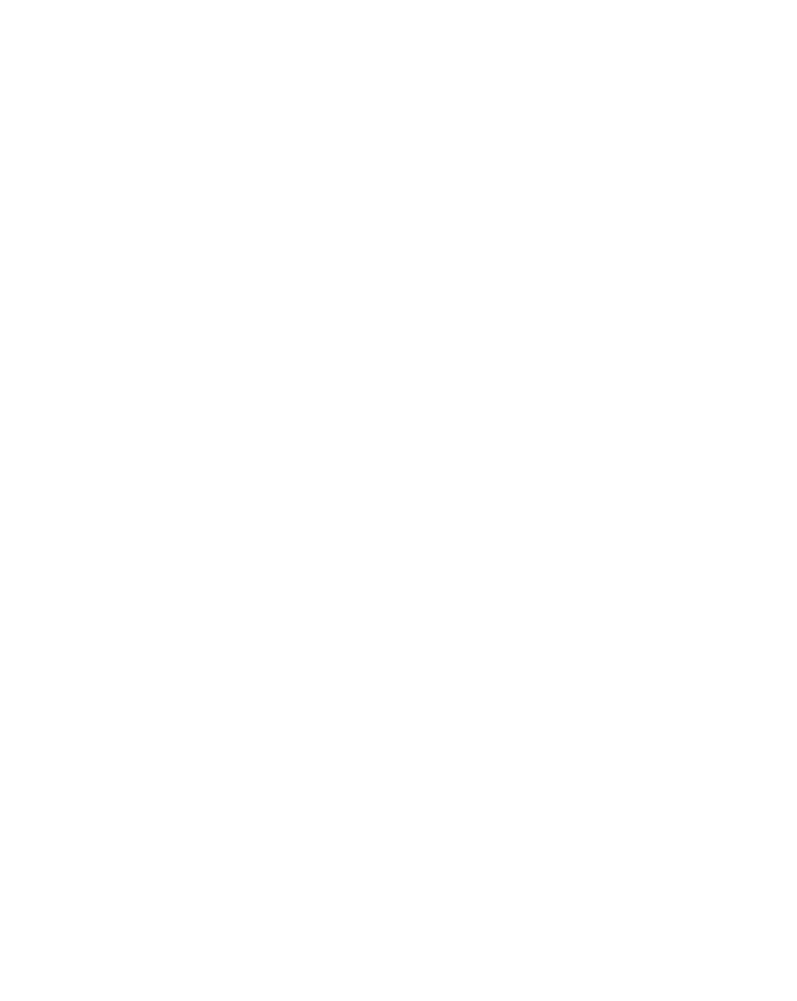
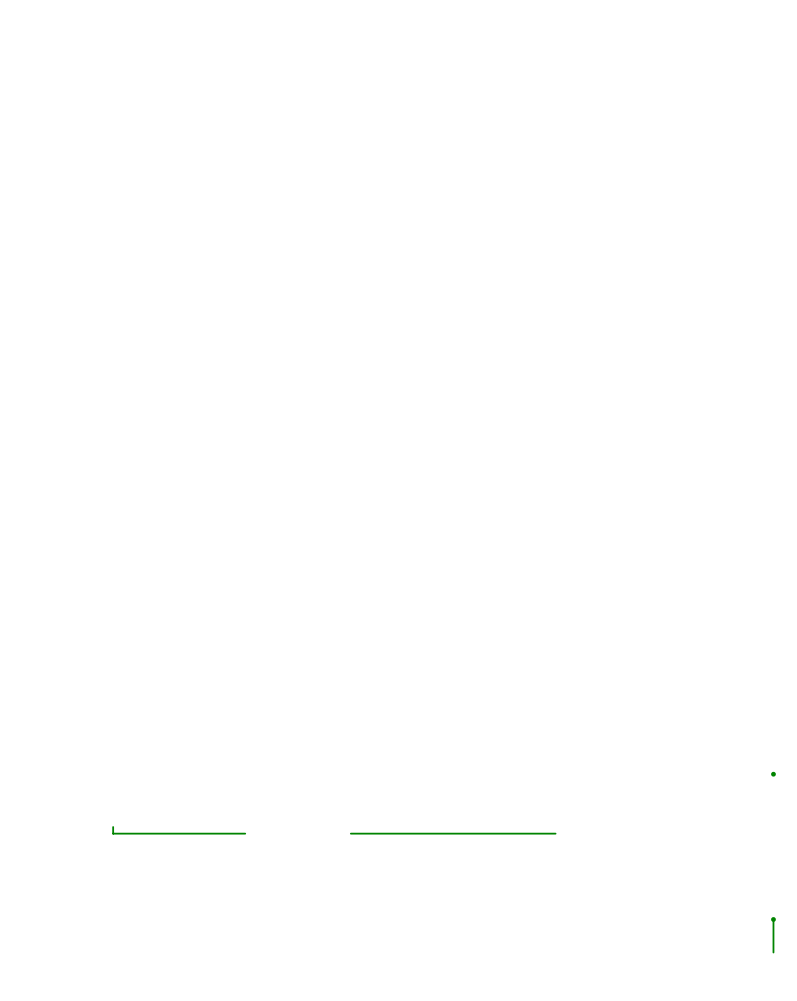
junction: none -> (773, 774)
wire: none -> (113, 827) (113, 833) (245, 833)
wire: none -> (350, 833) (555, 833)
wire: none -> (773, 919) (773, 952)
junction: none -> (773, 919)

